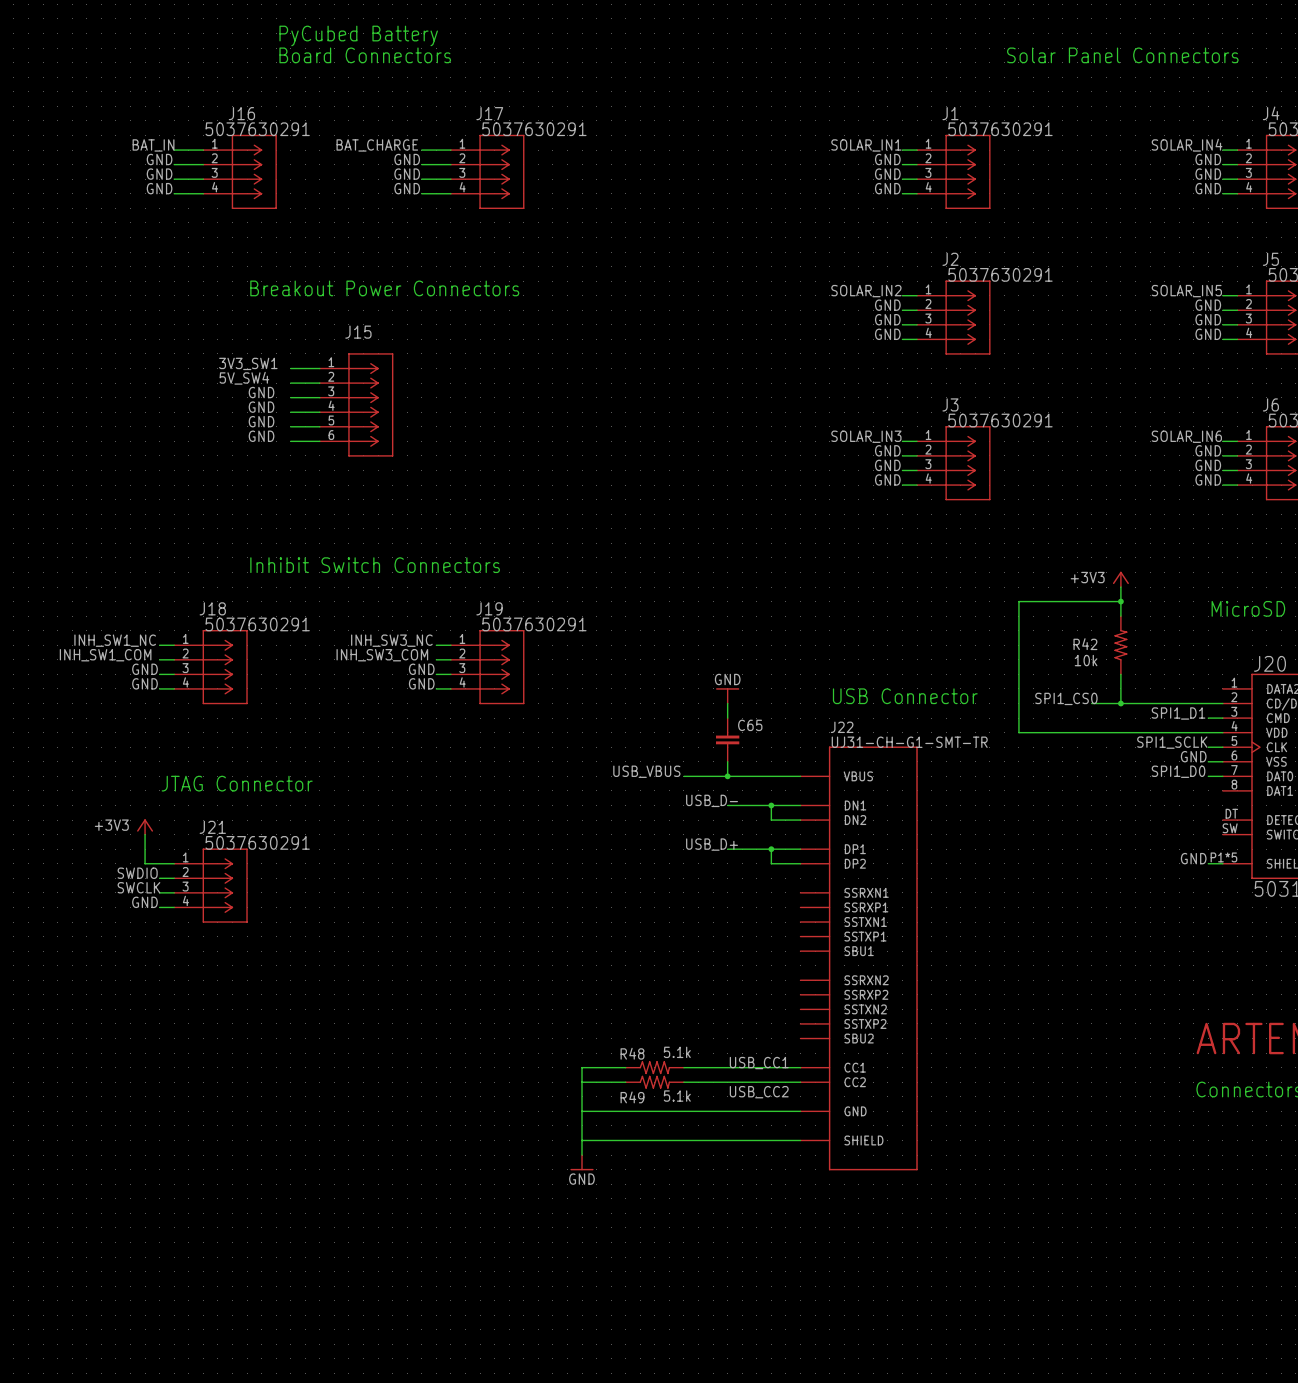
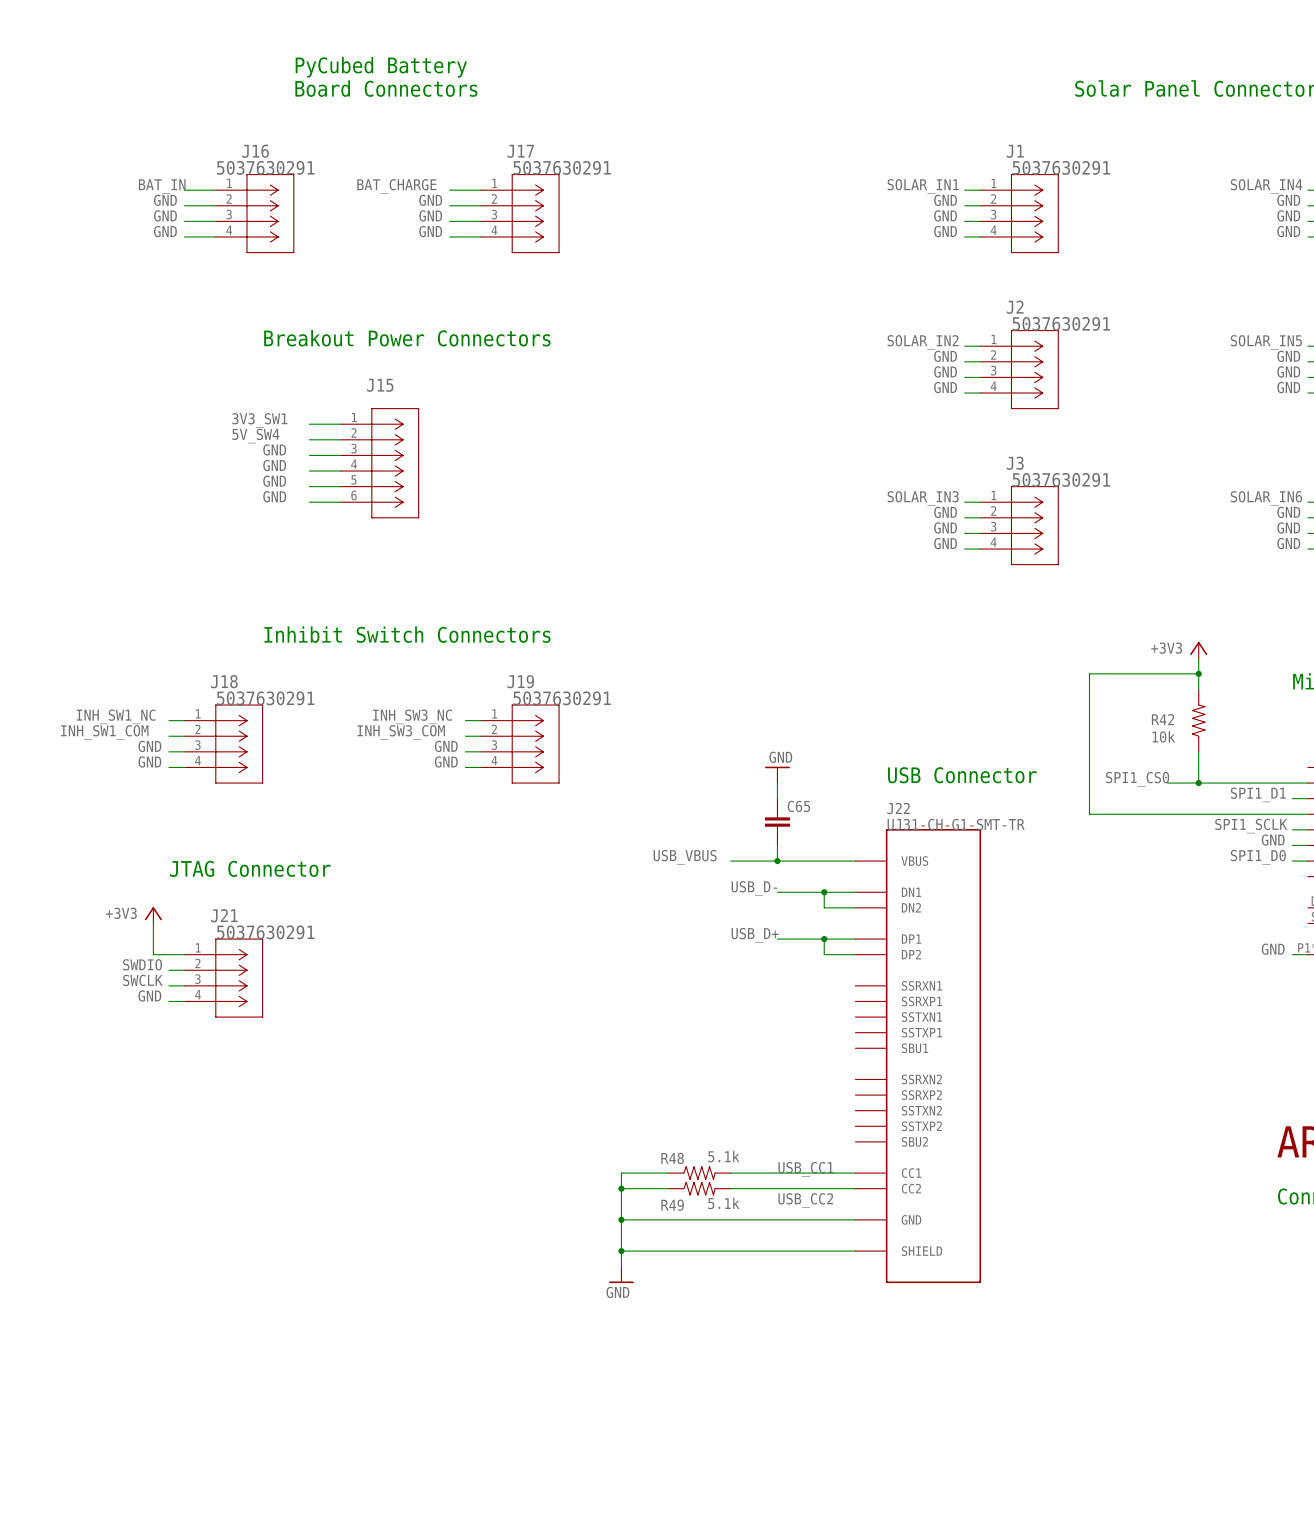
junction: none -> (621, 1188)
junction: none -> (621, 1219)
junction: none -> (621, 1251)

